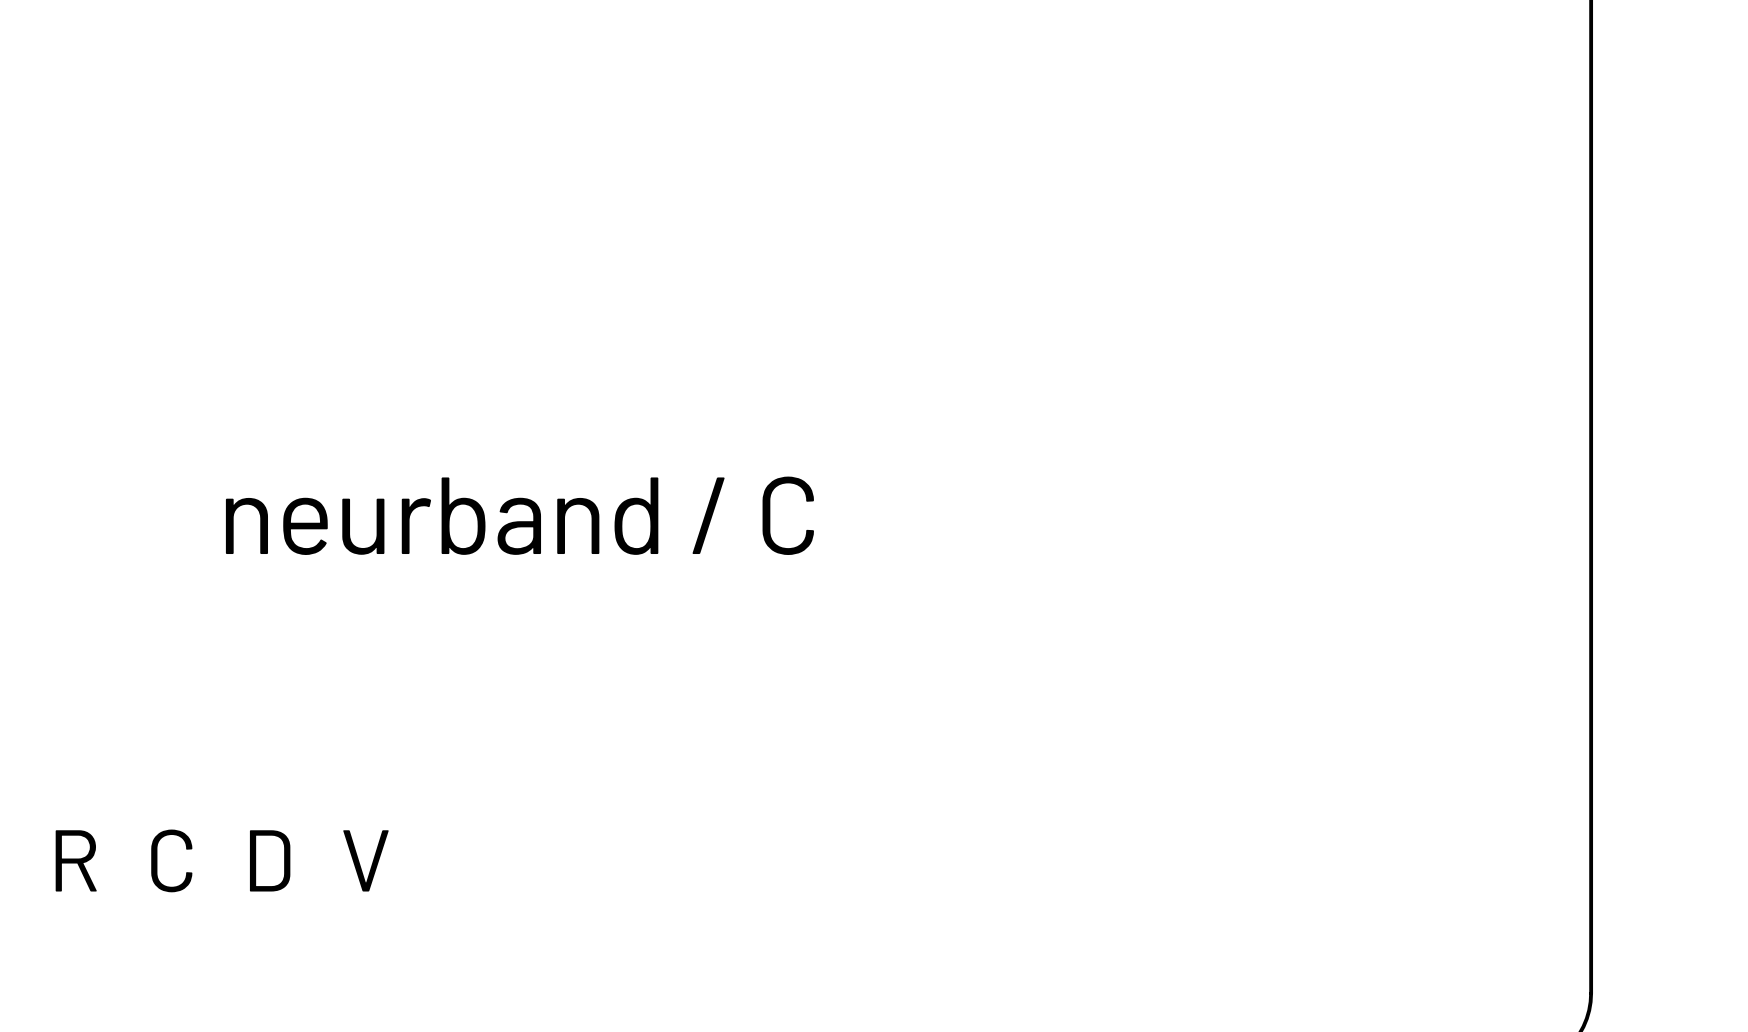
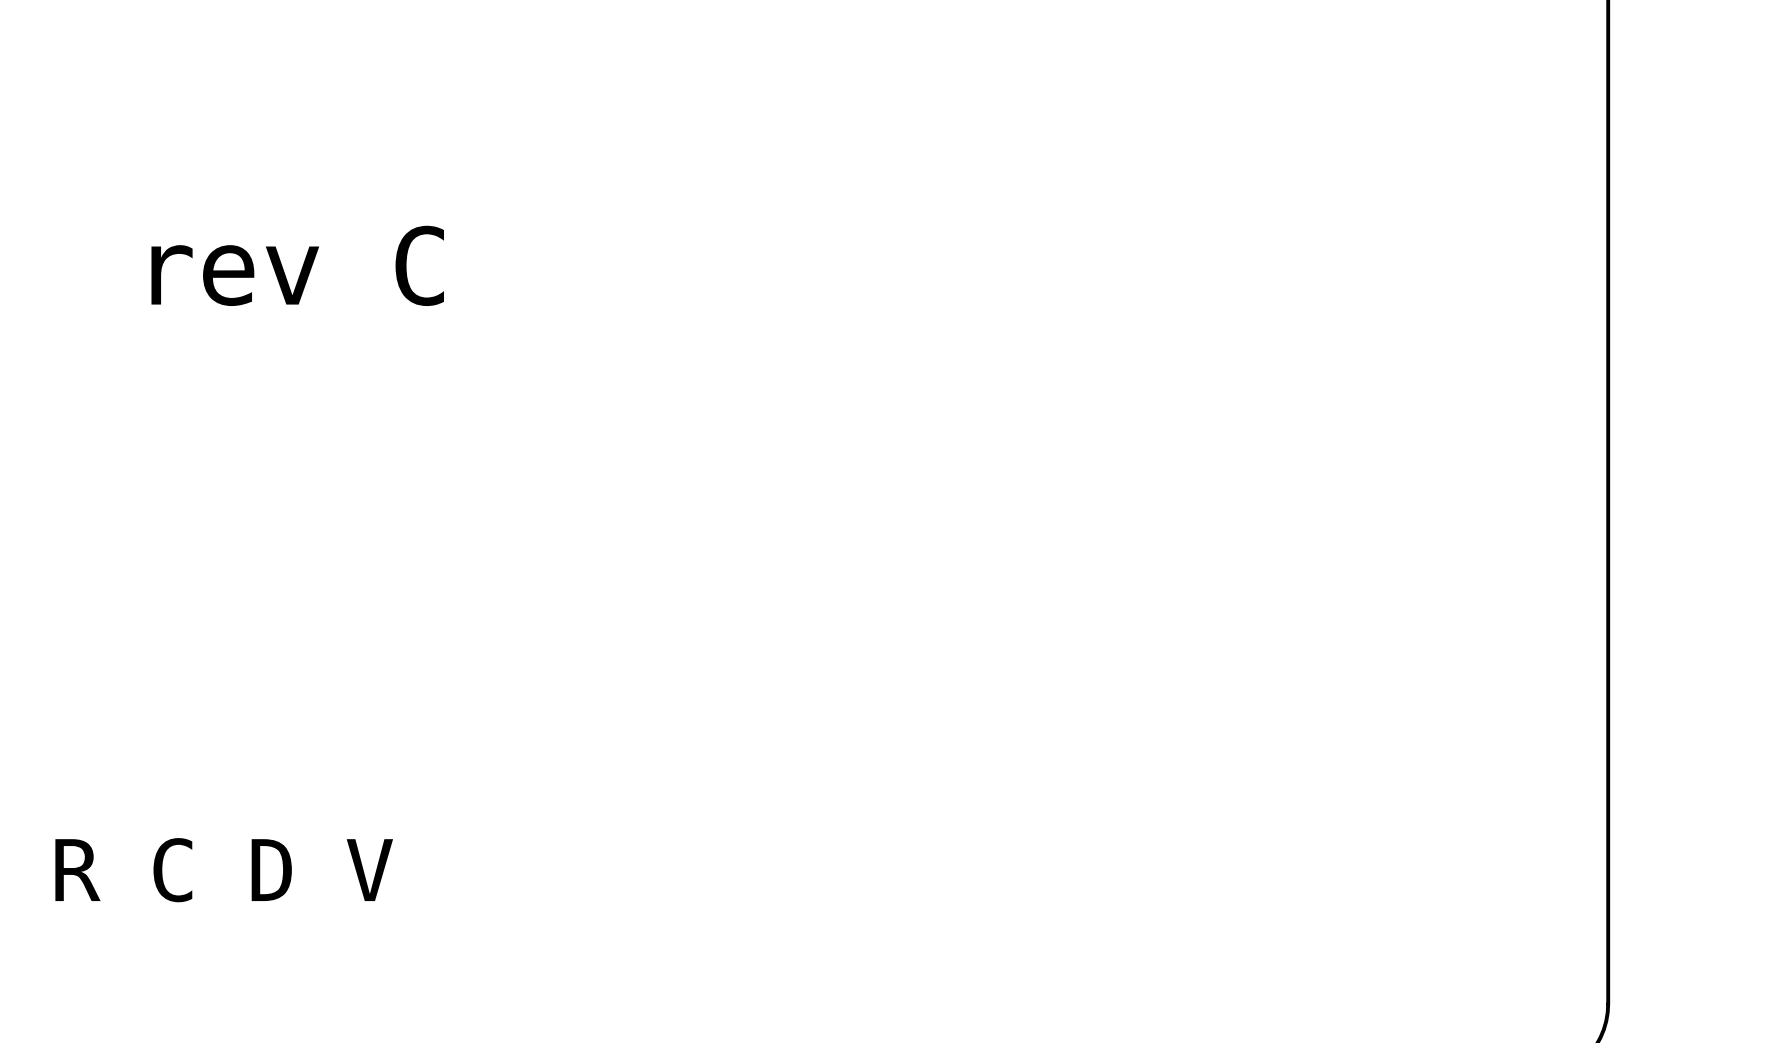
text: none -> rev C (297, 265)
text: neurband / C (519, 515) -> none

